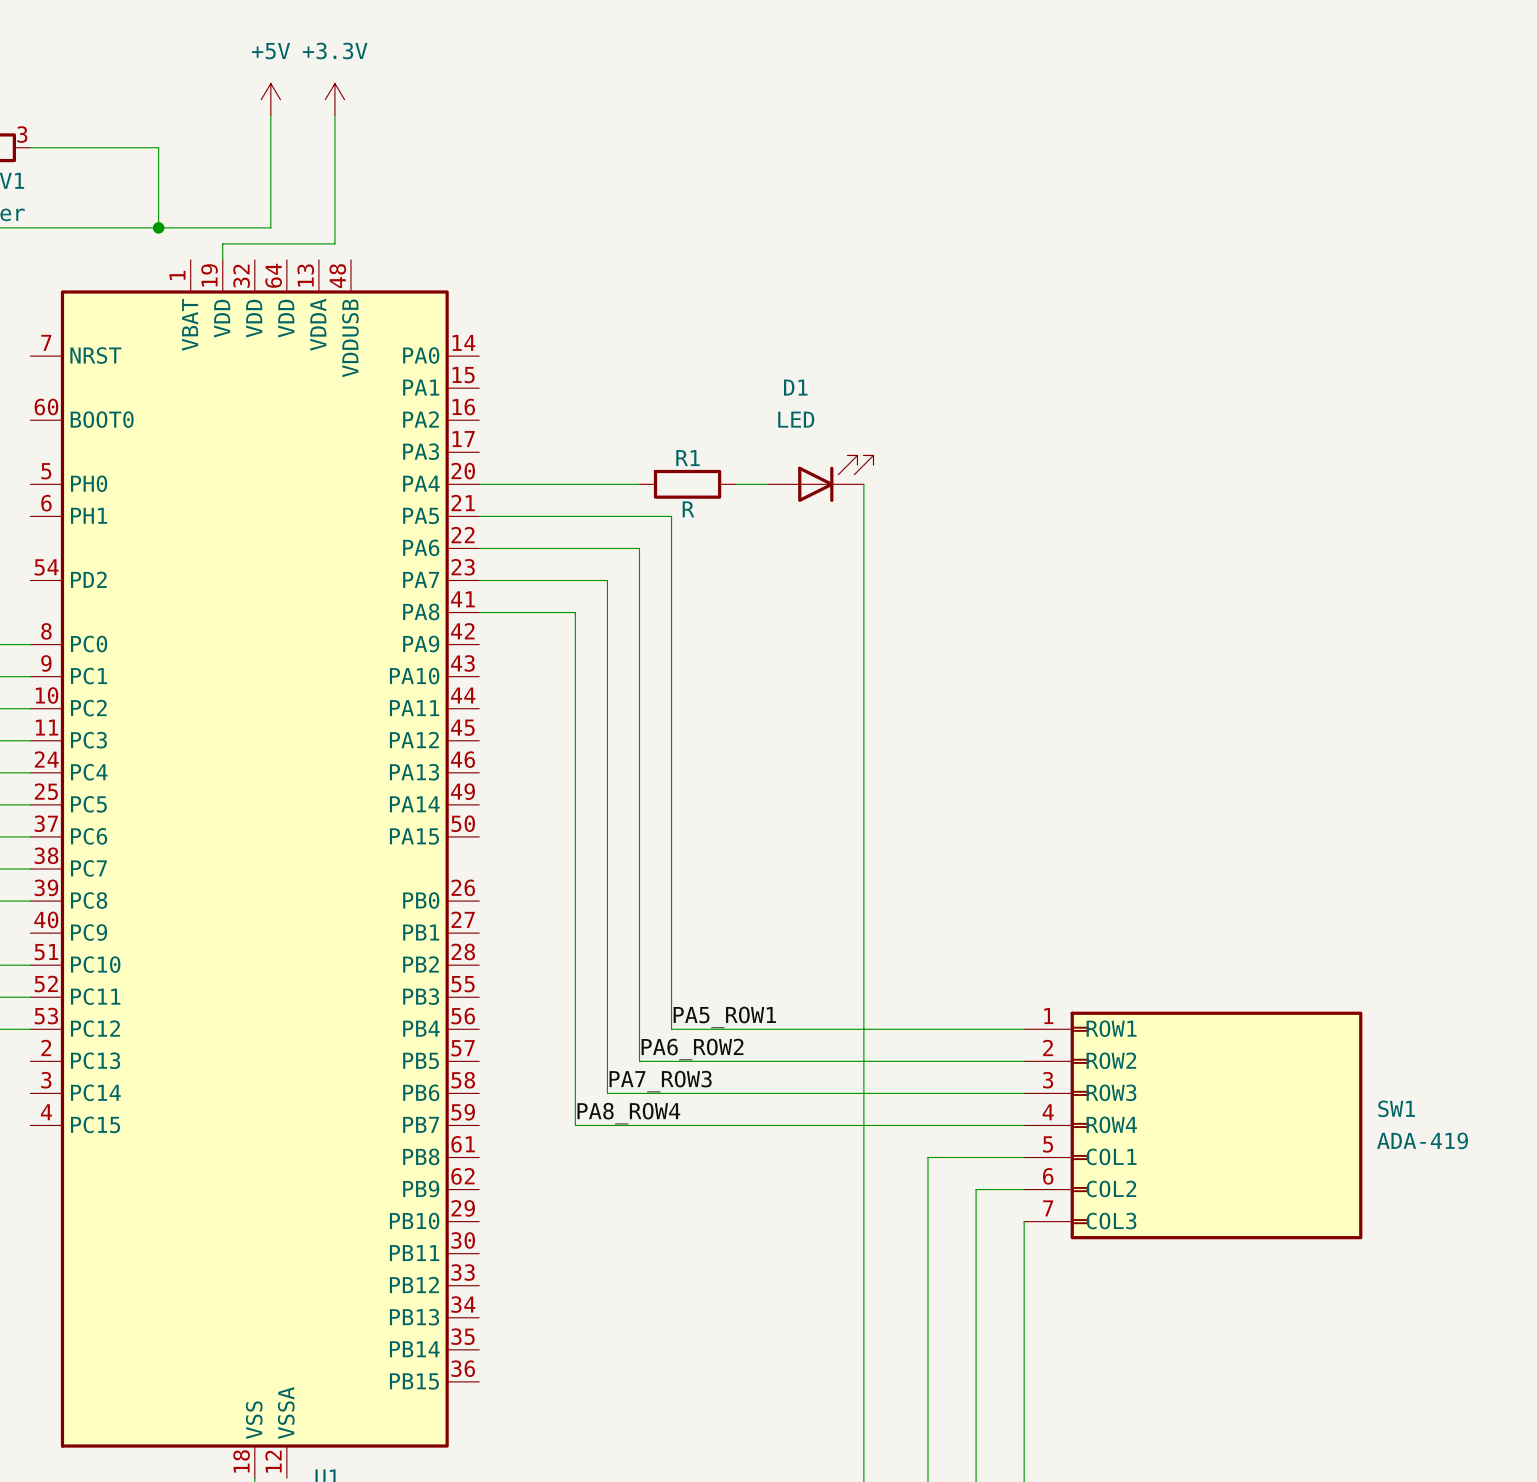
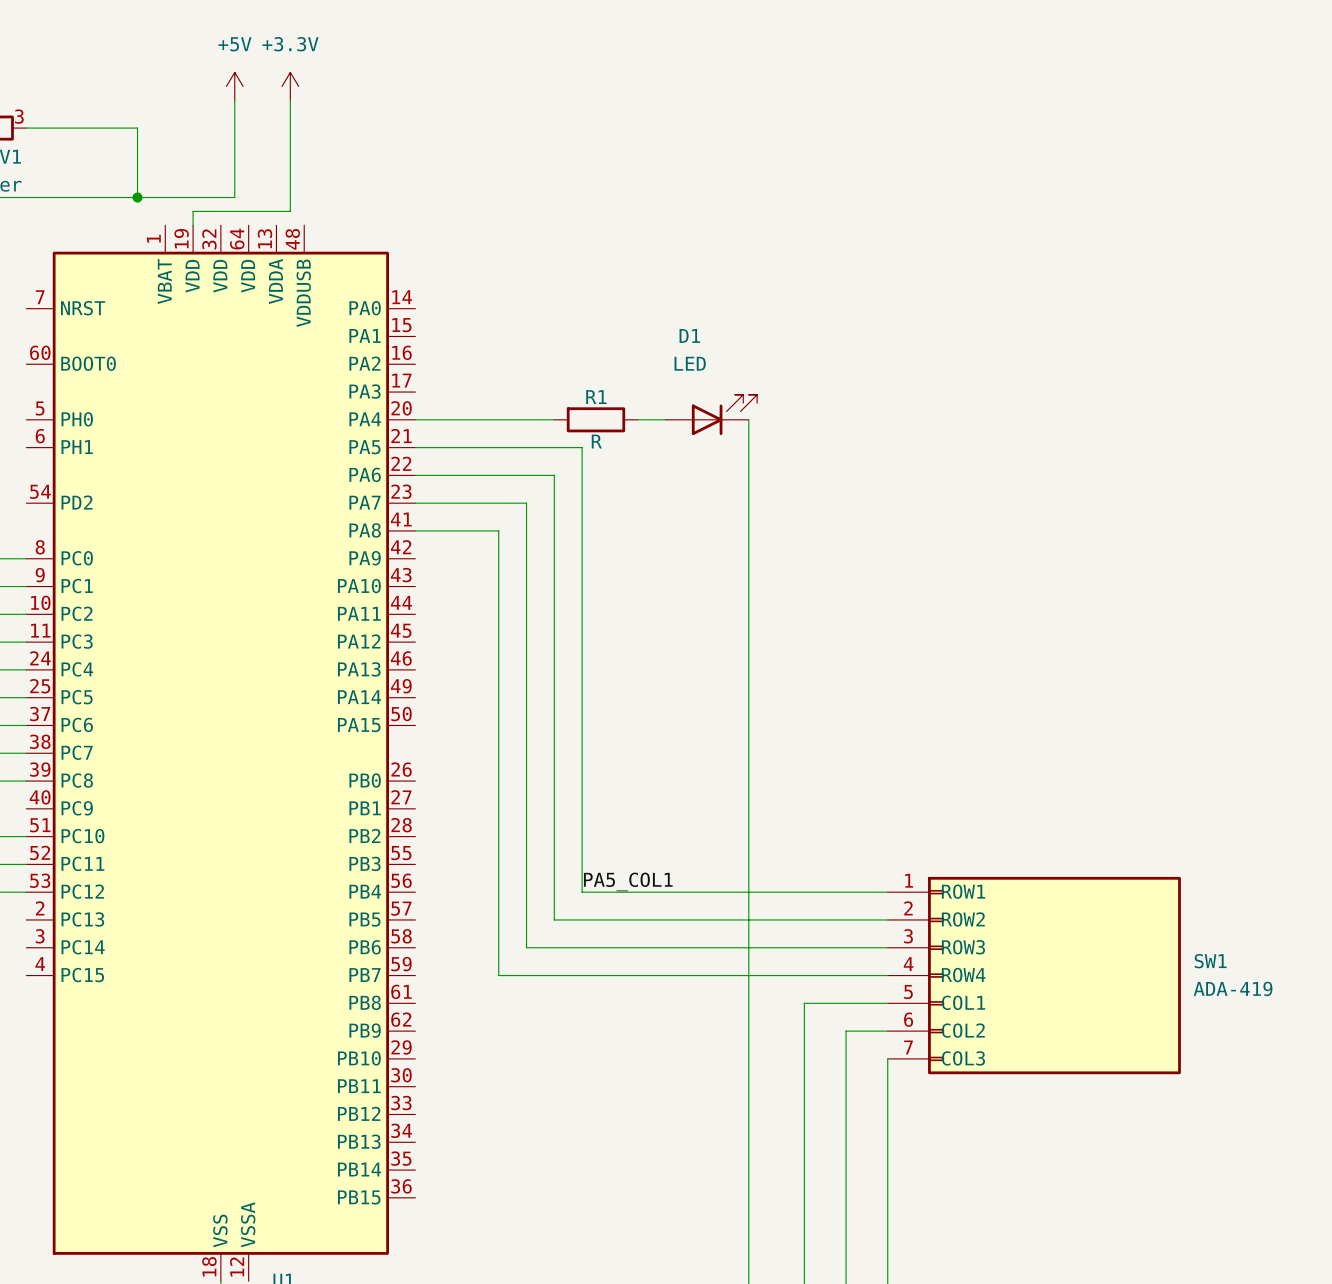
label: PA5_ROW1 (724, 1017) -> PA5_COL1 (628, 881)
label: PA6_ROW2 (692, 1049) -> none
label: PA7_ROW3 (660, 1081) -> none
label: PA8_ROW4 (628, 1113) -> none

